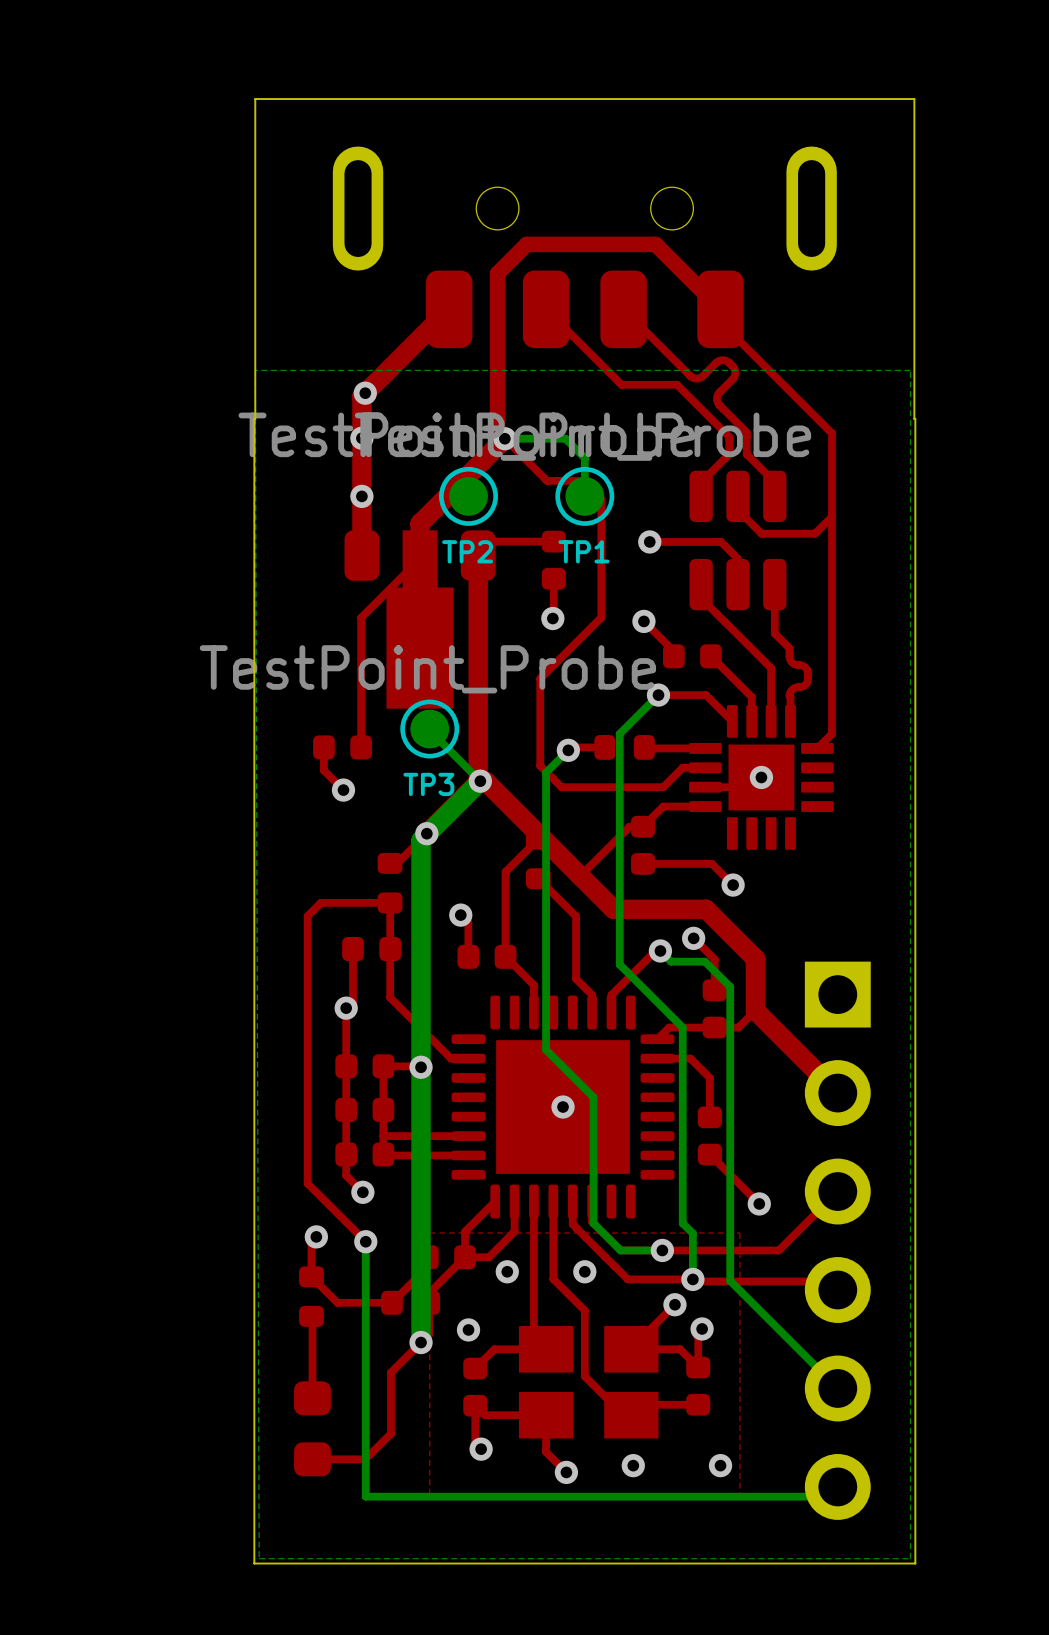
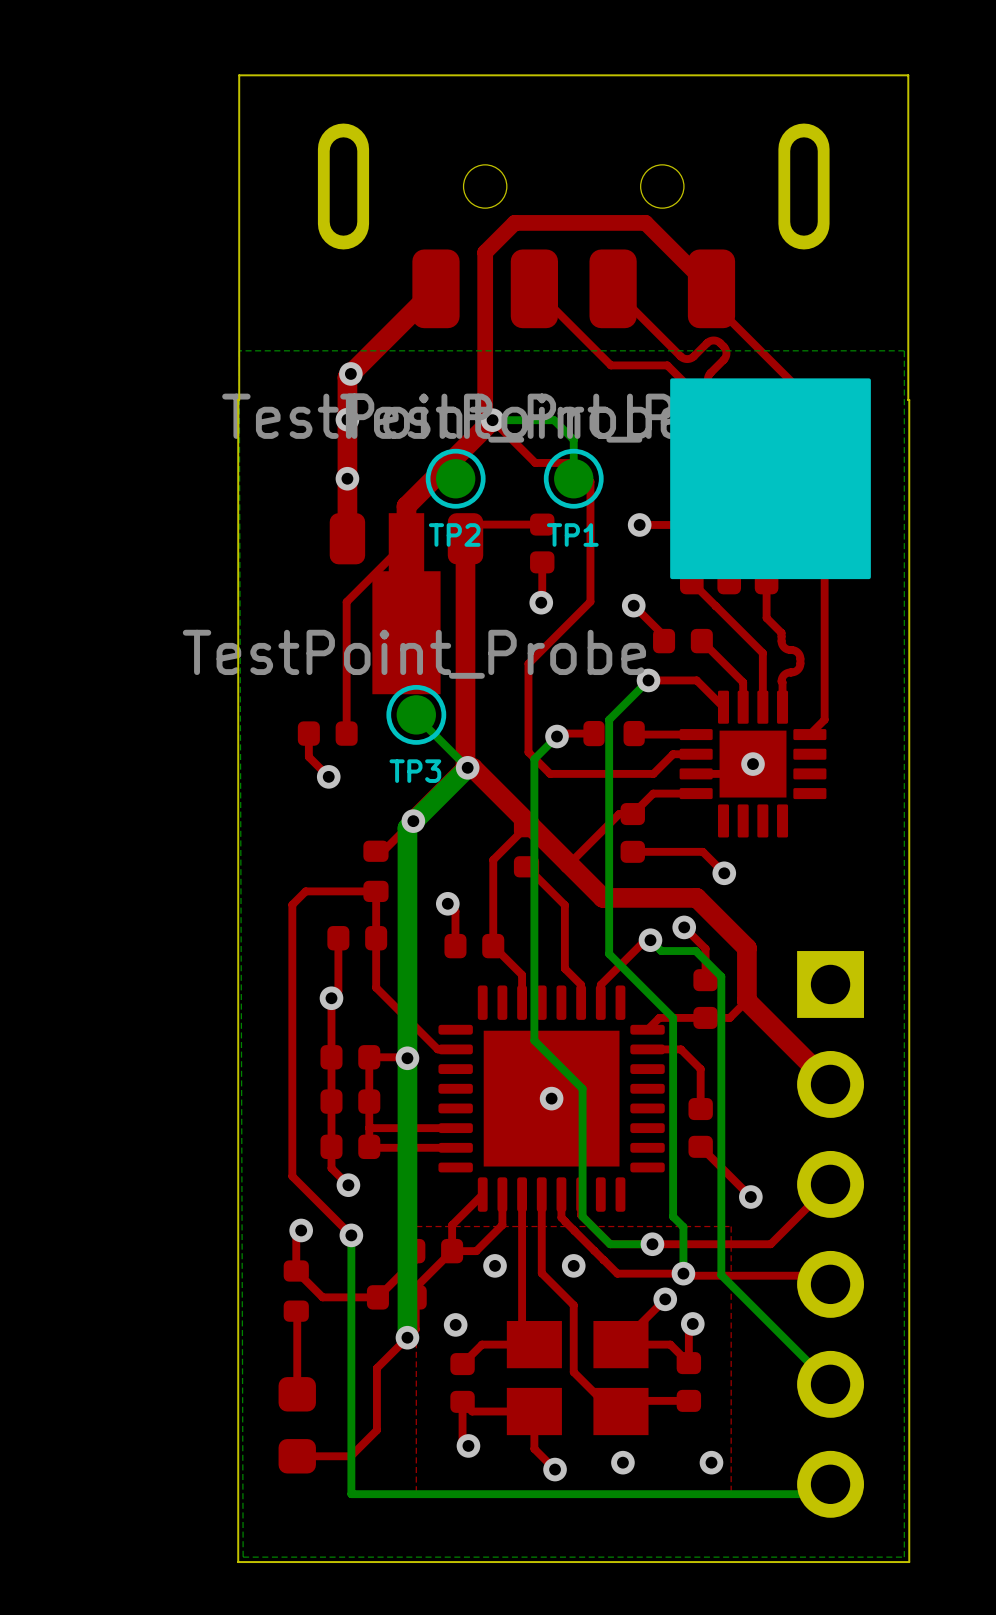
drawing: none -> [670, 378, 871, 580]

